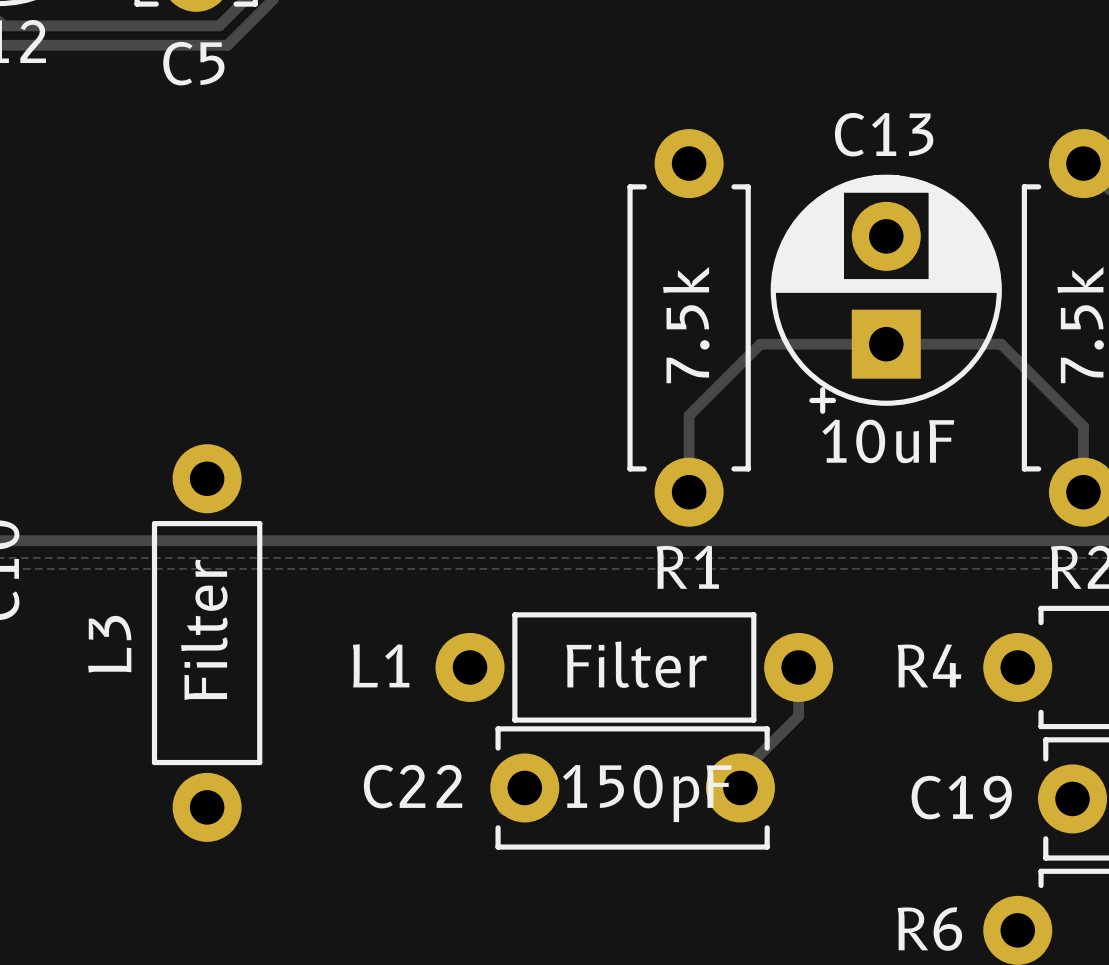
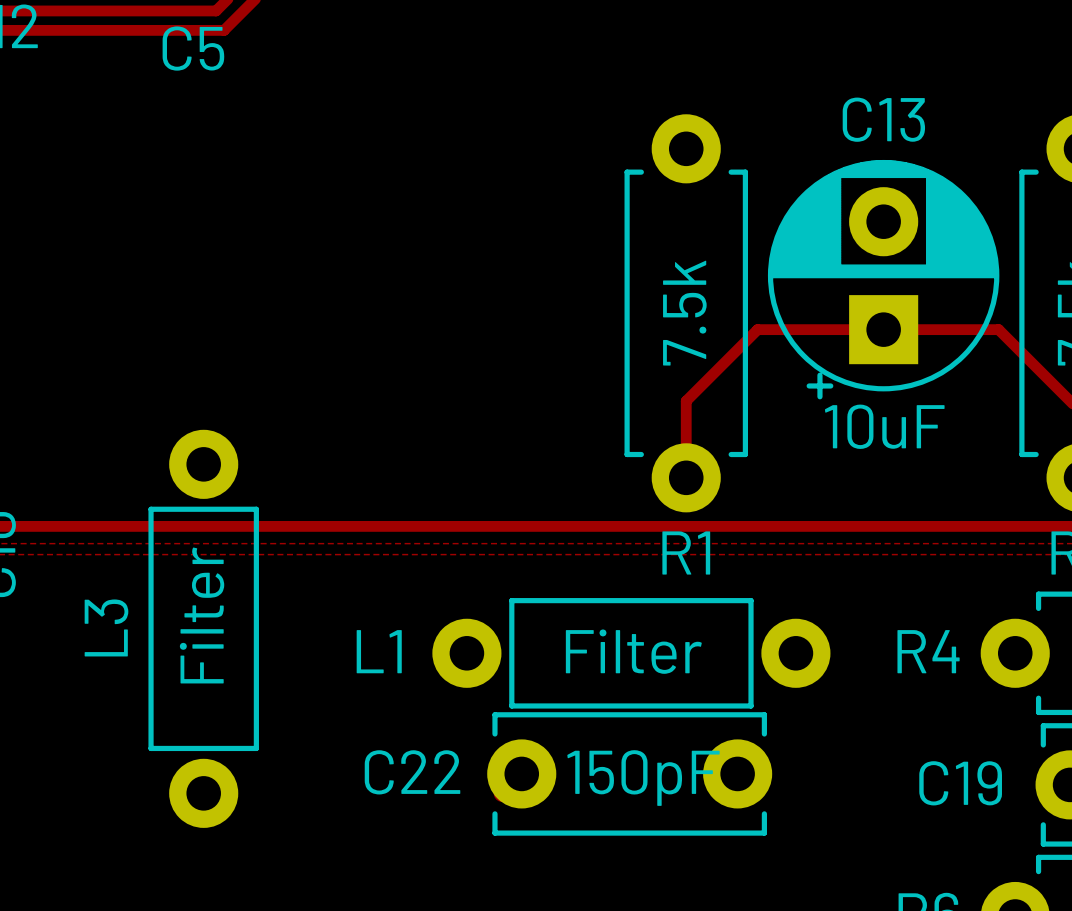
track: (798, 667) (798, 716) (740, 774) (740, 787) -> none

